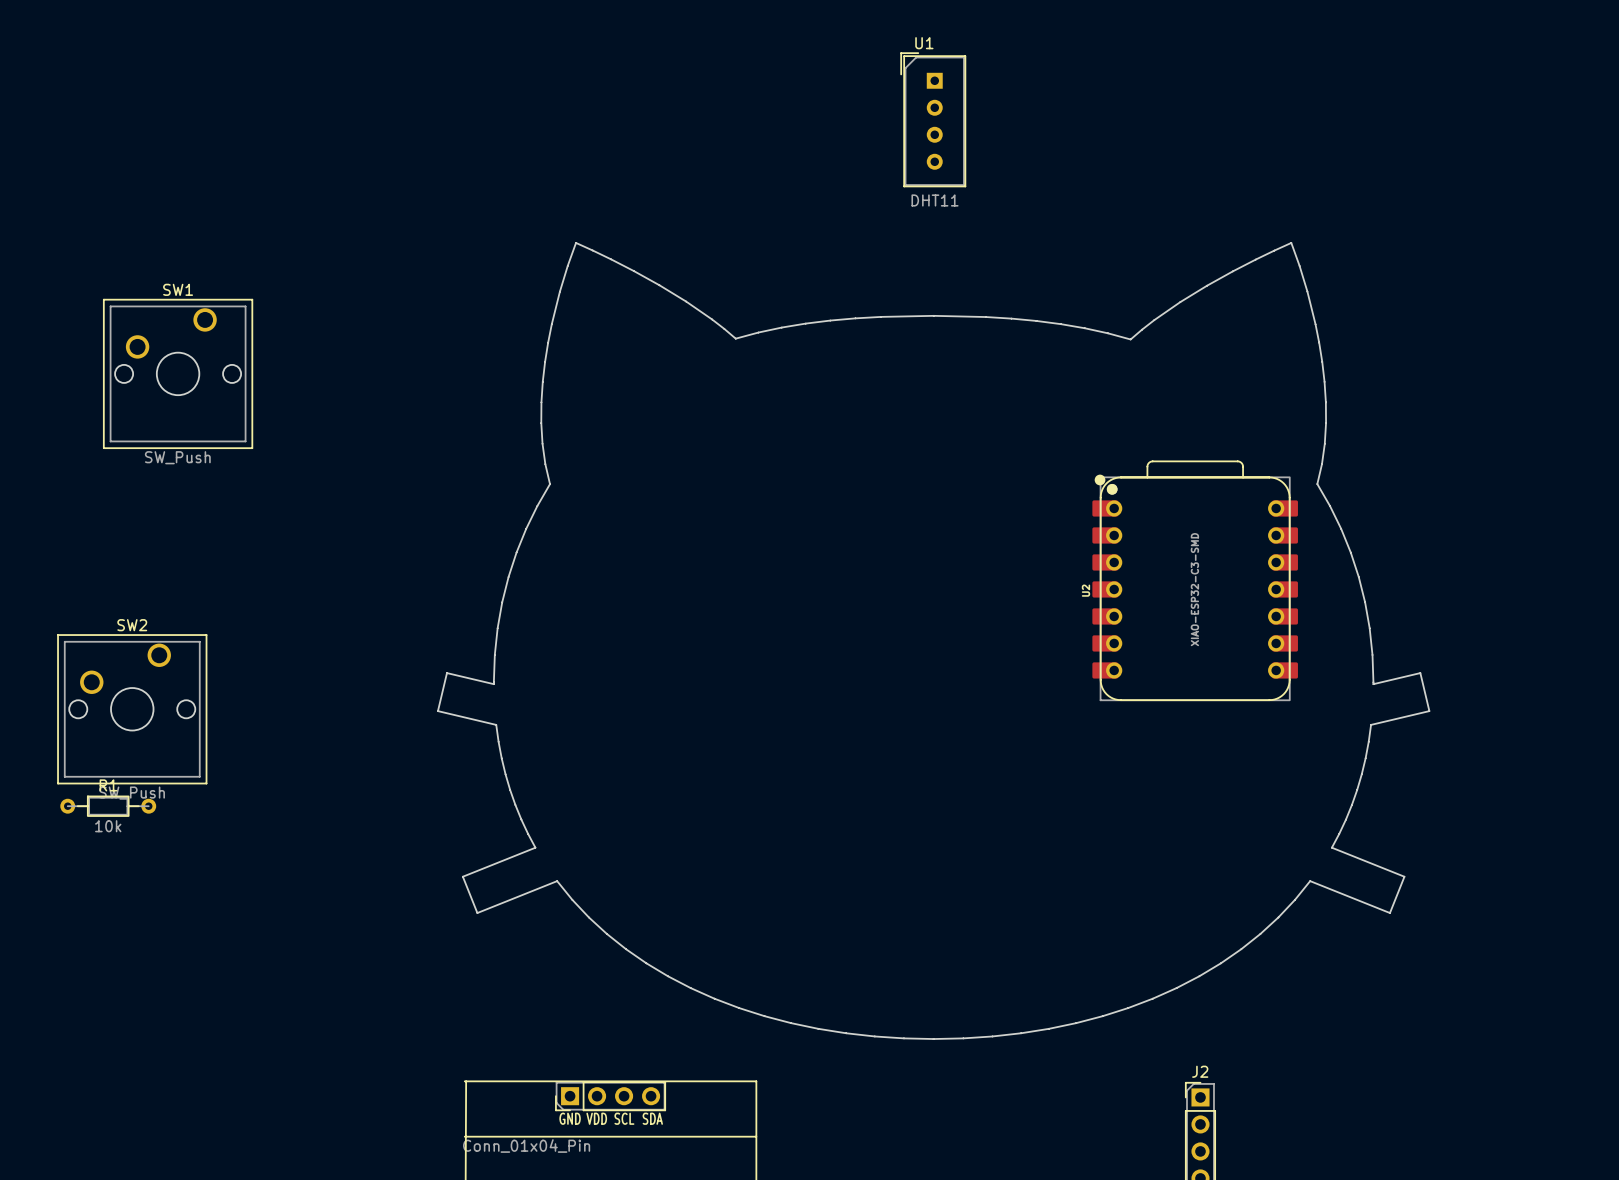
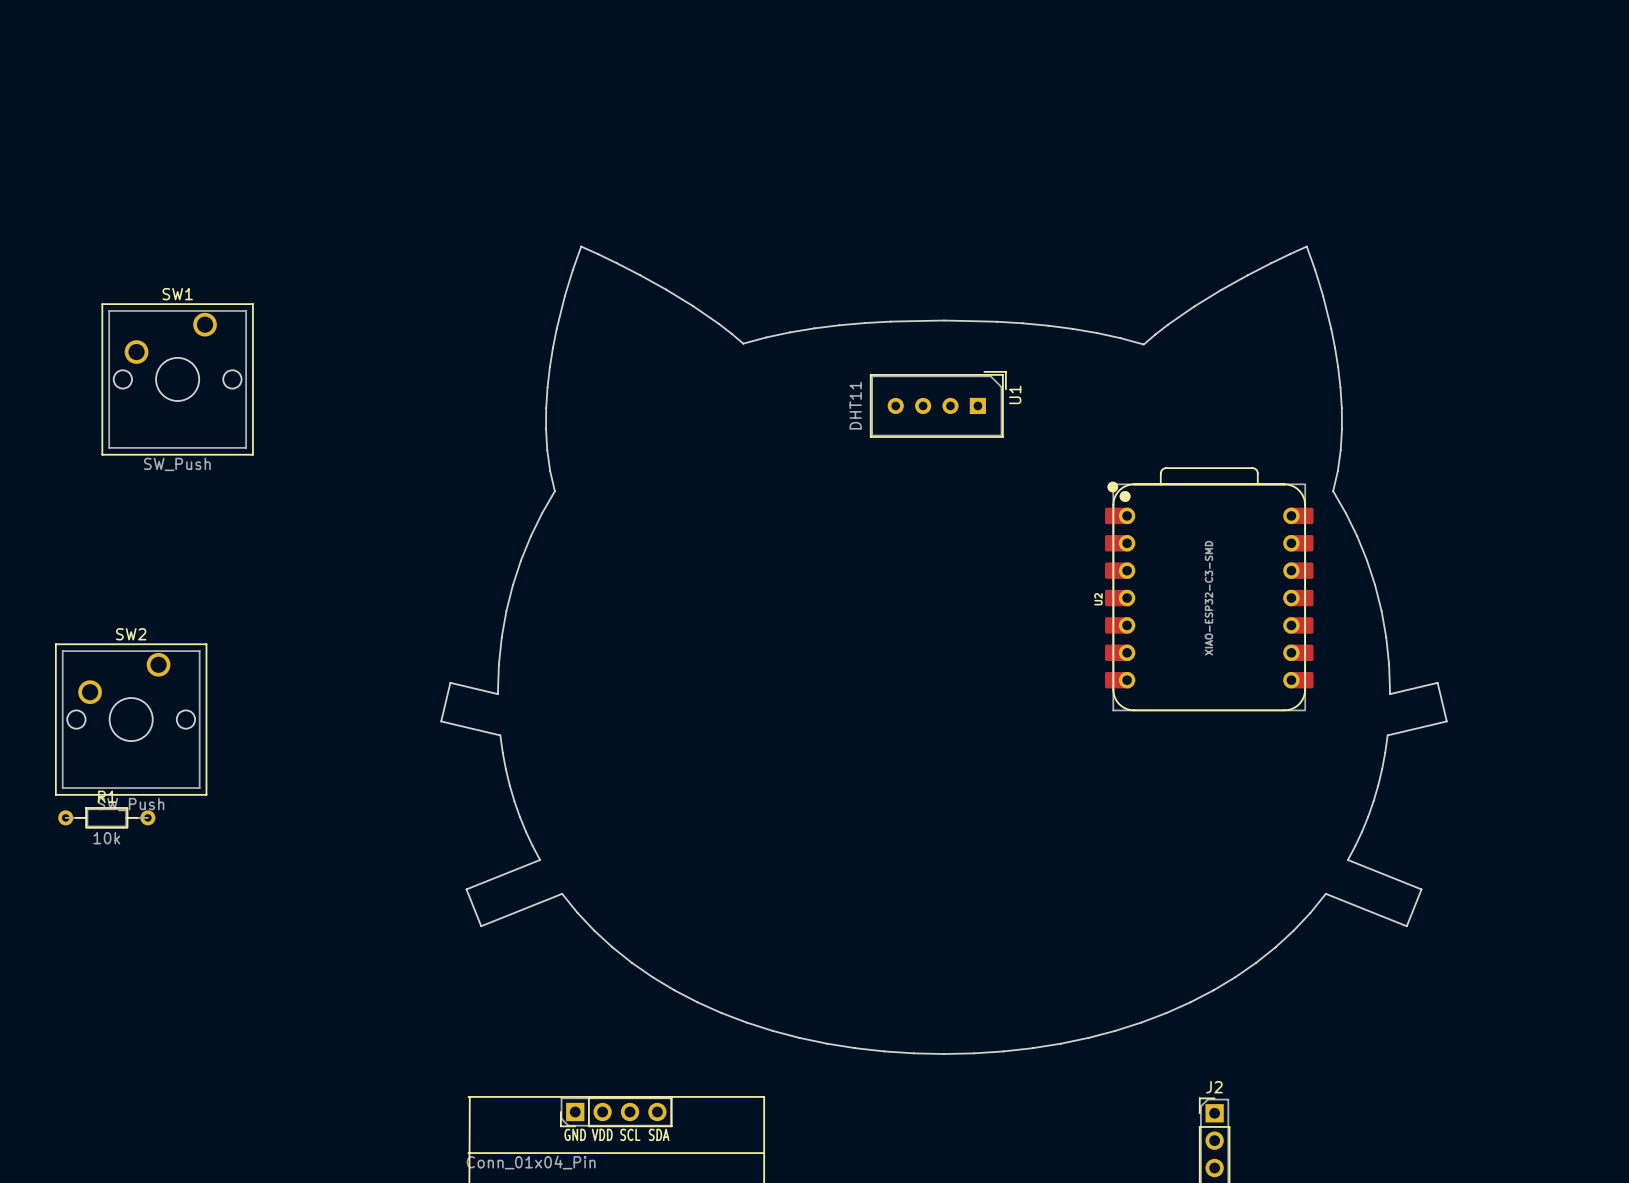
U1 rotation: 0° (933, 119) -> 90° clockwise (938, 404)
U1 position: (933, 119) -> (938, 404)

